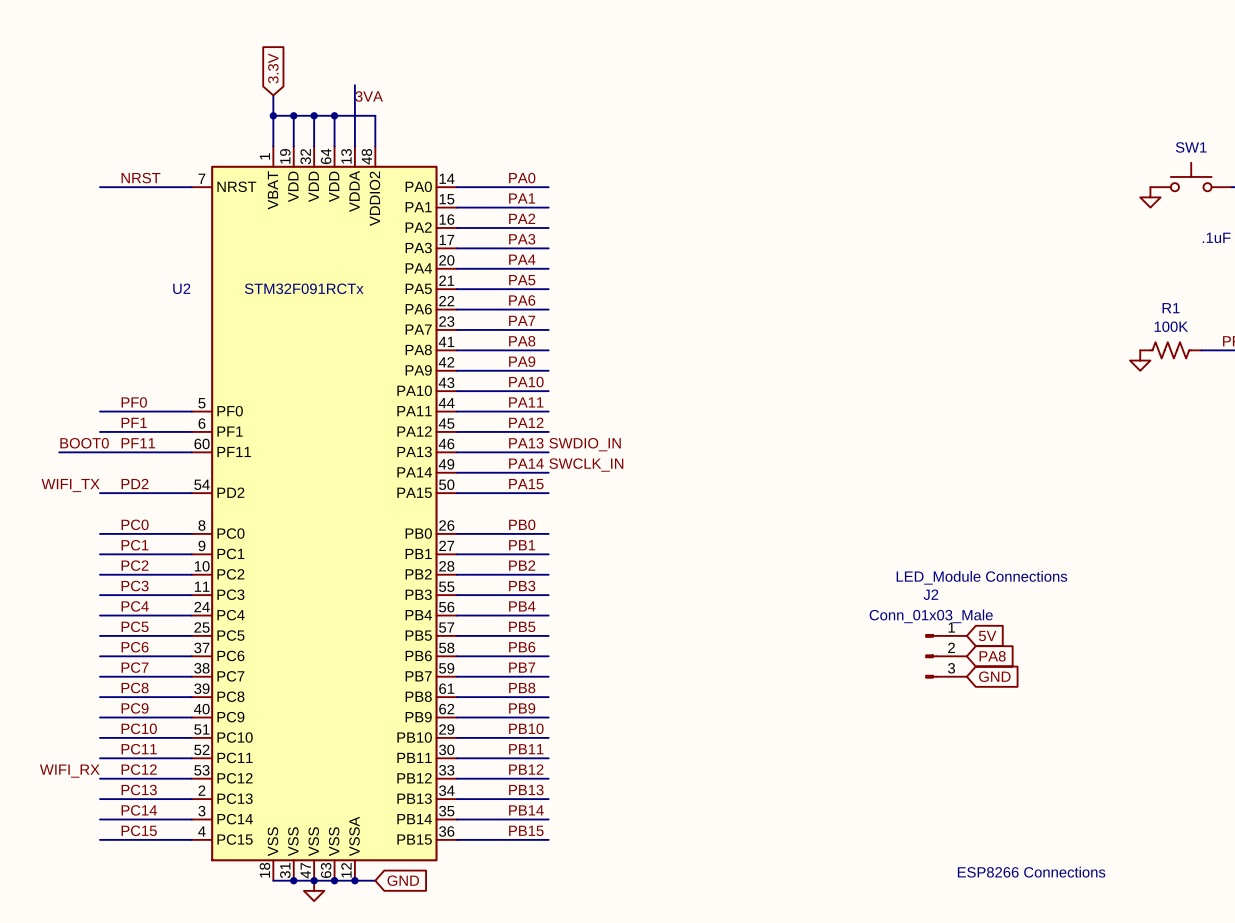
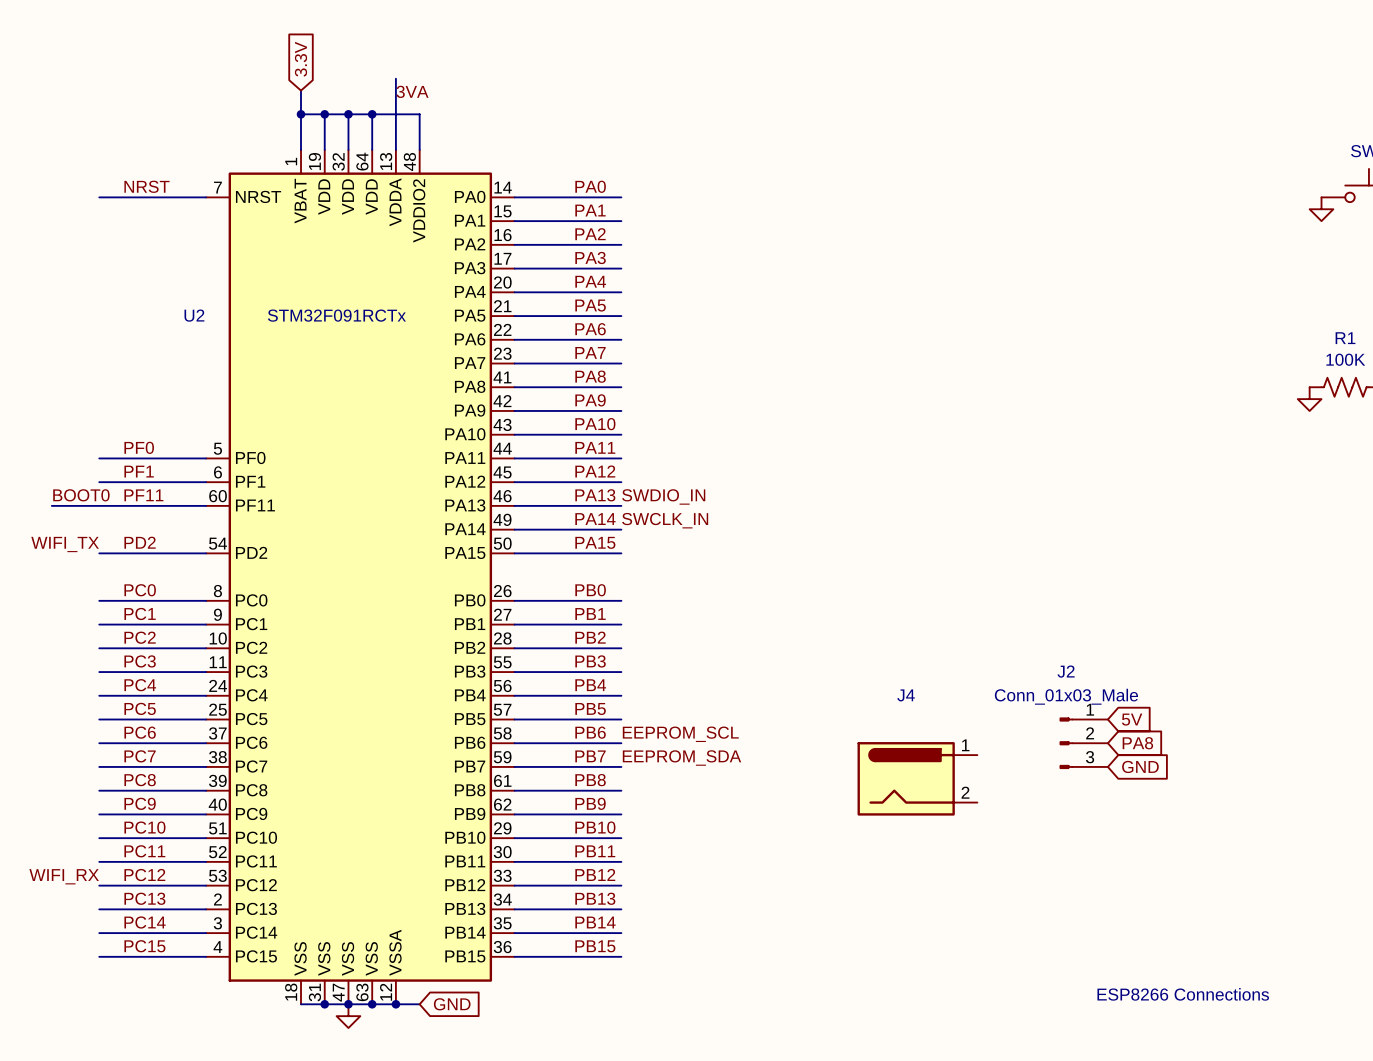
text: LED_Module Connections (981, 577) -> none
label: none -> EEPROM_SCL (680, 734)
label: none -> EEPROM_SDA (681, 758)
J4: none -> (917, 778)

